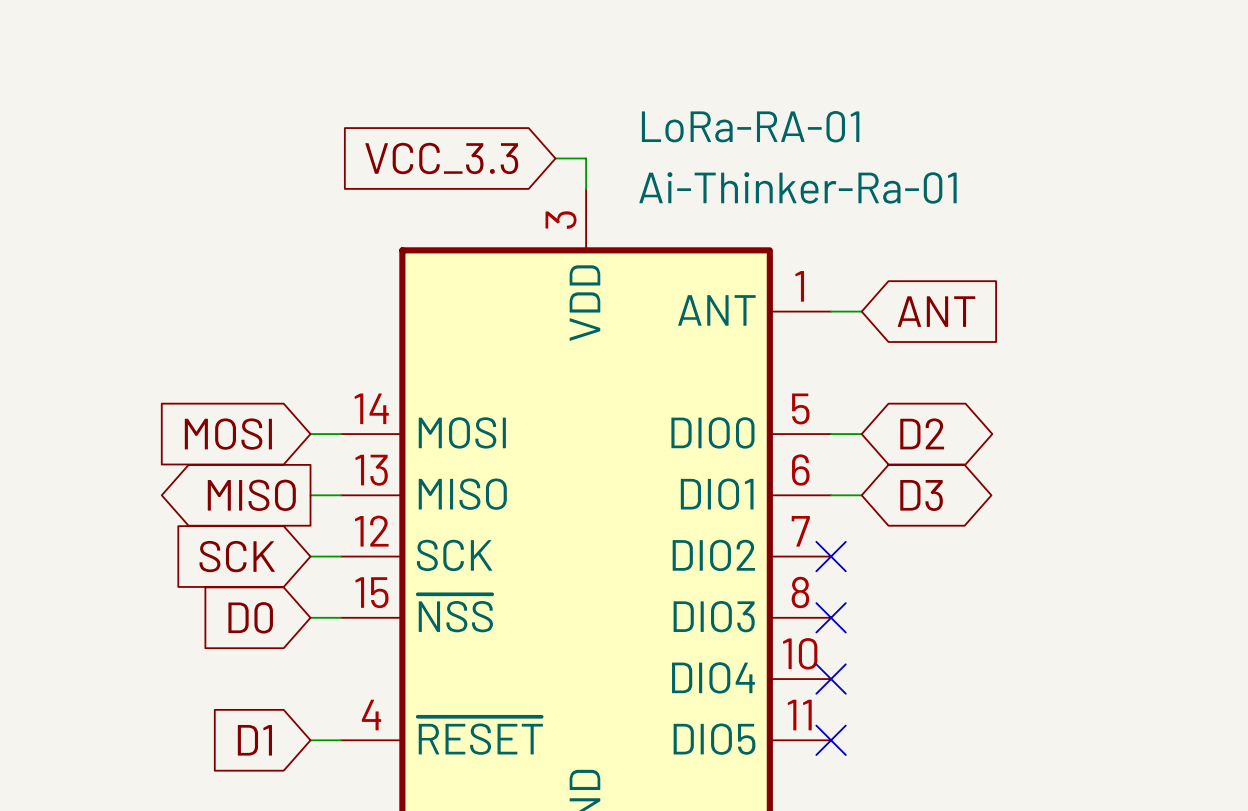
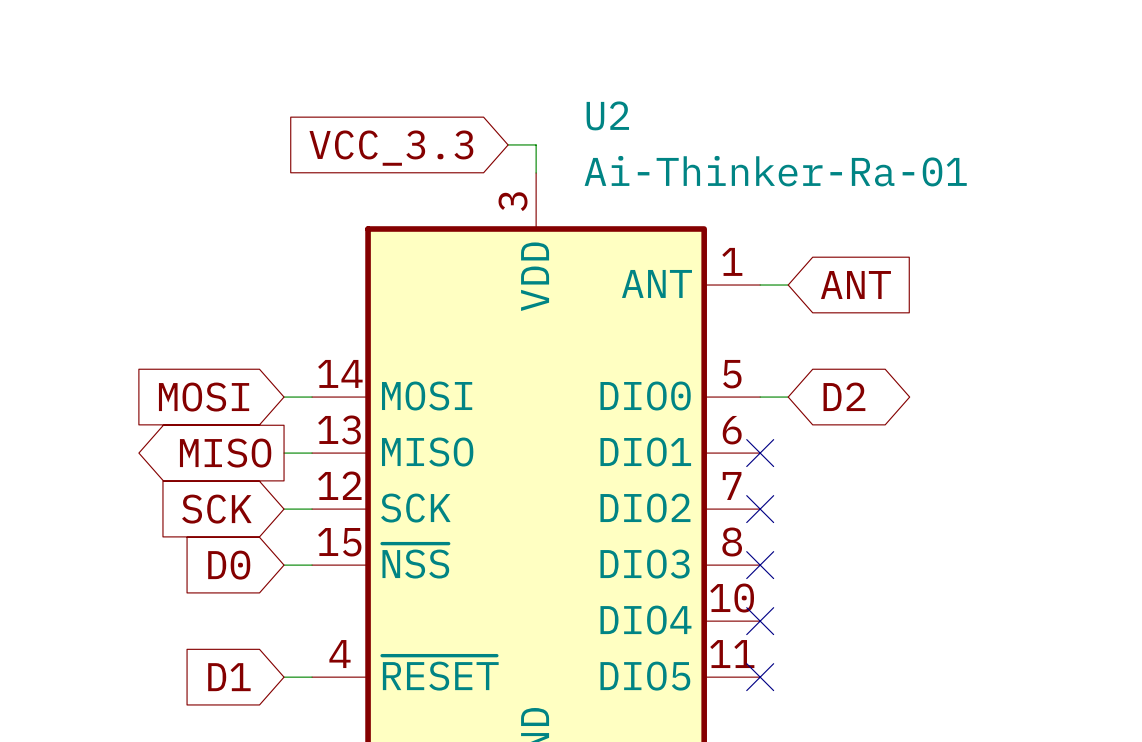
LoRa-RA-01 name: LoRa-RA-01 (750, 126) -> U2 (607, 115)
wire: (831, 495) (861, 495) -> none
no-connect mark: none -> (760, 453)
global label: D3 (921, 495) -> none

